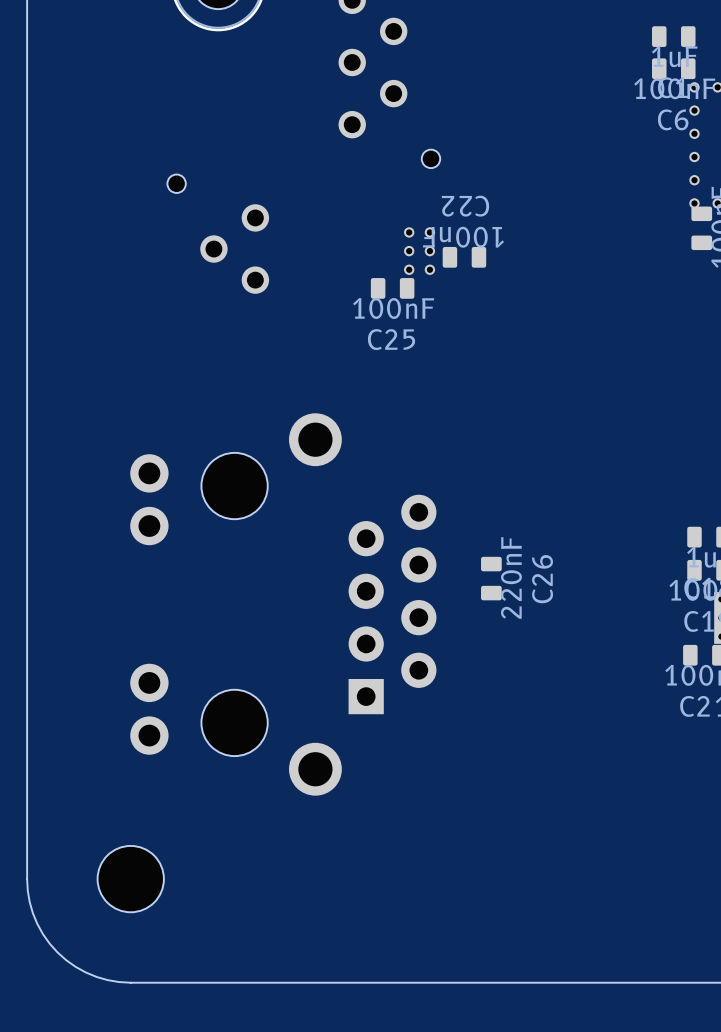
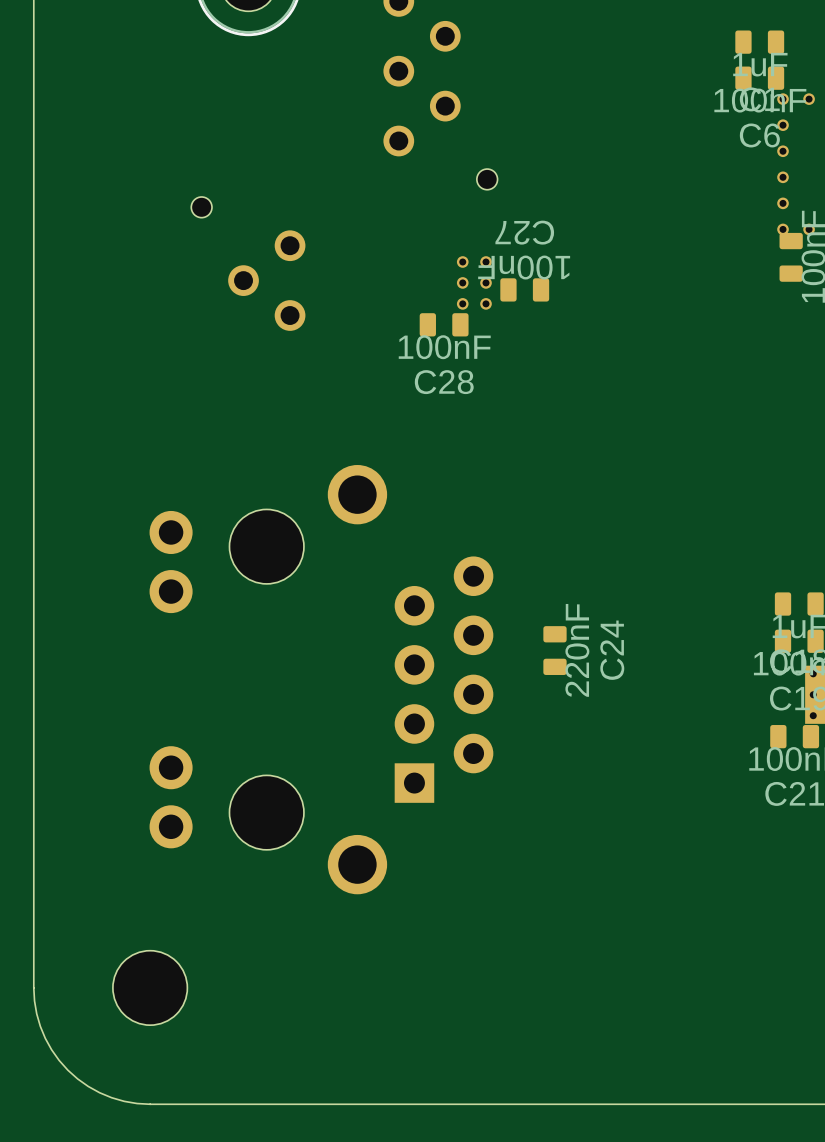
C22 name: C22 (465, 206) -> C27 (524, 232)
C25 name: C25 (391, 339) -> C28 (444, 382)
C26 name: C26 (542, 579) -> C24 (612, 650)

